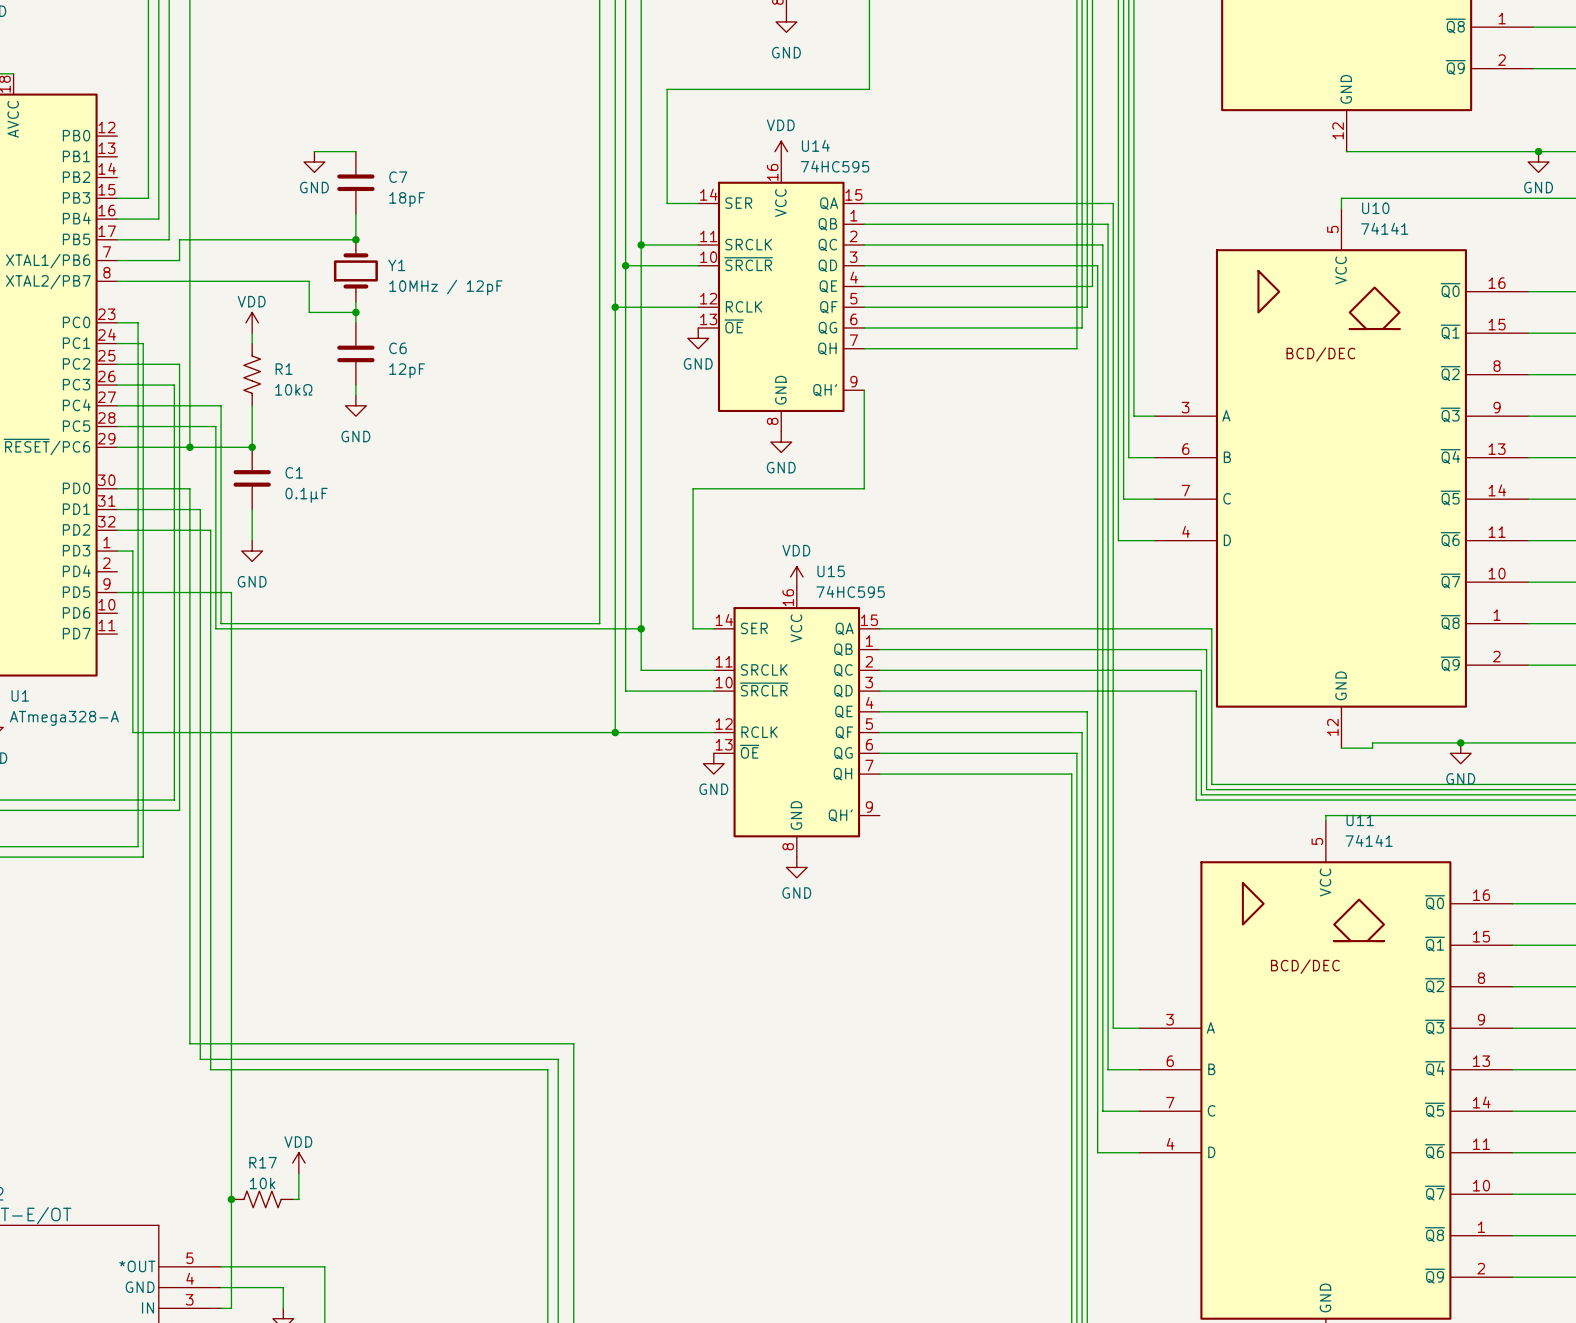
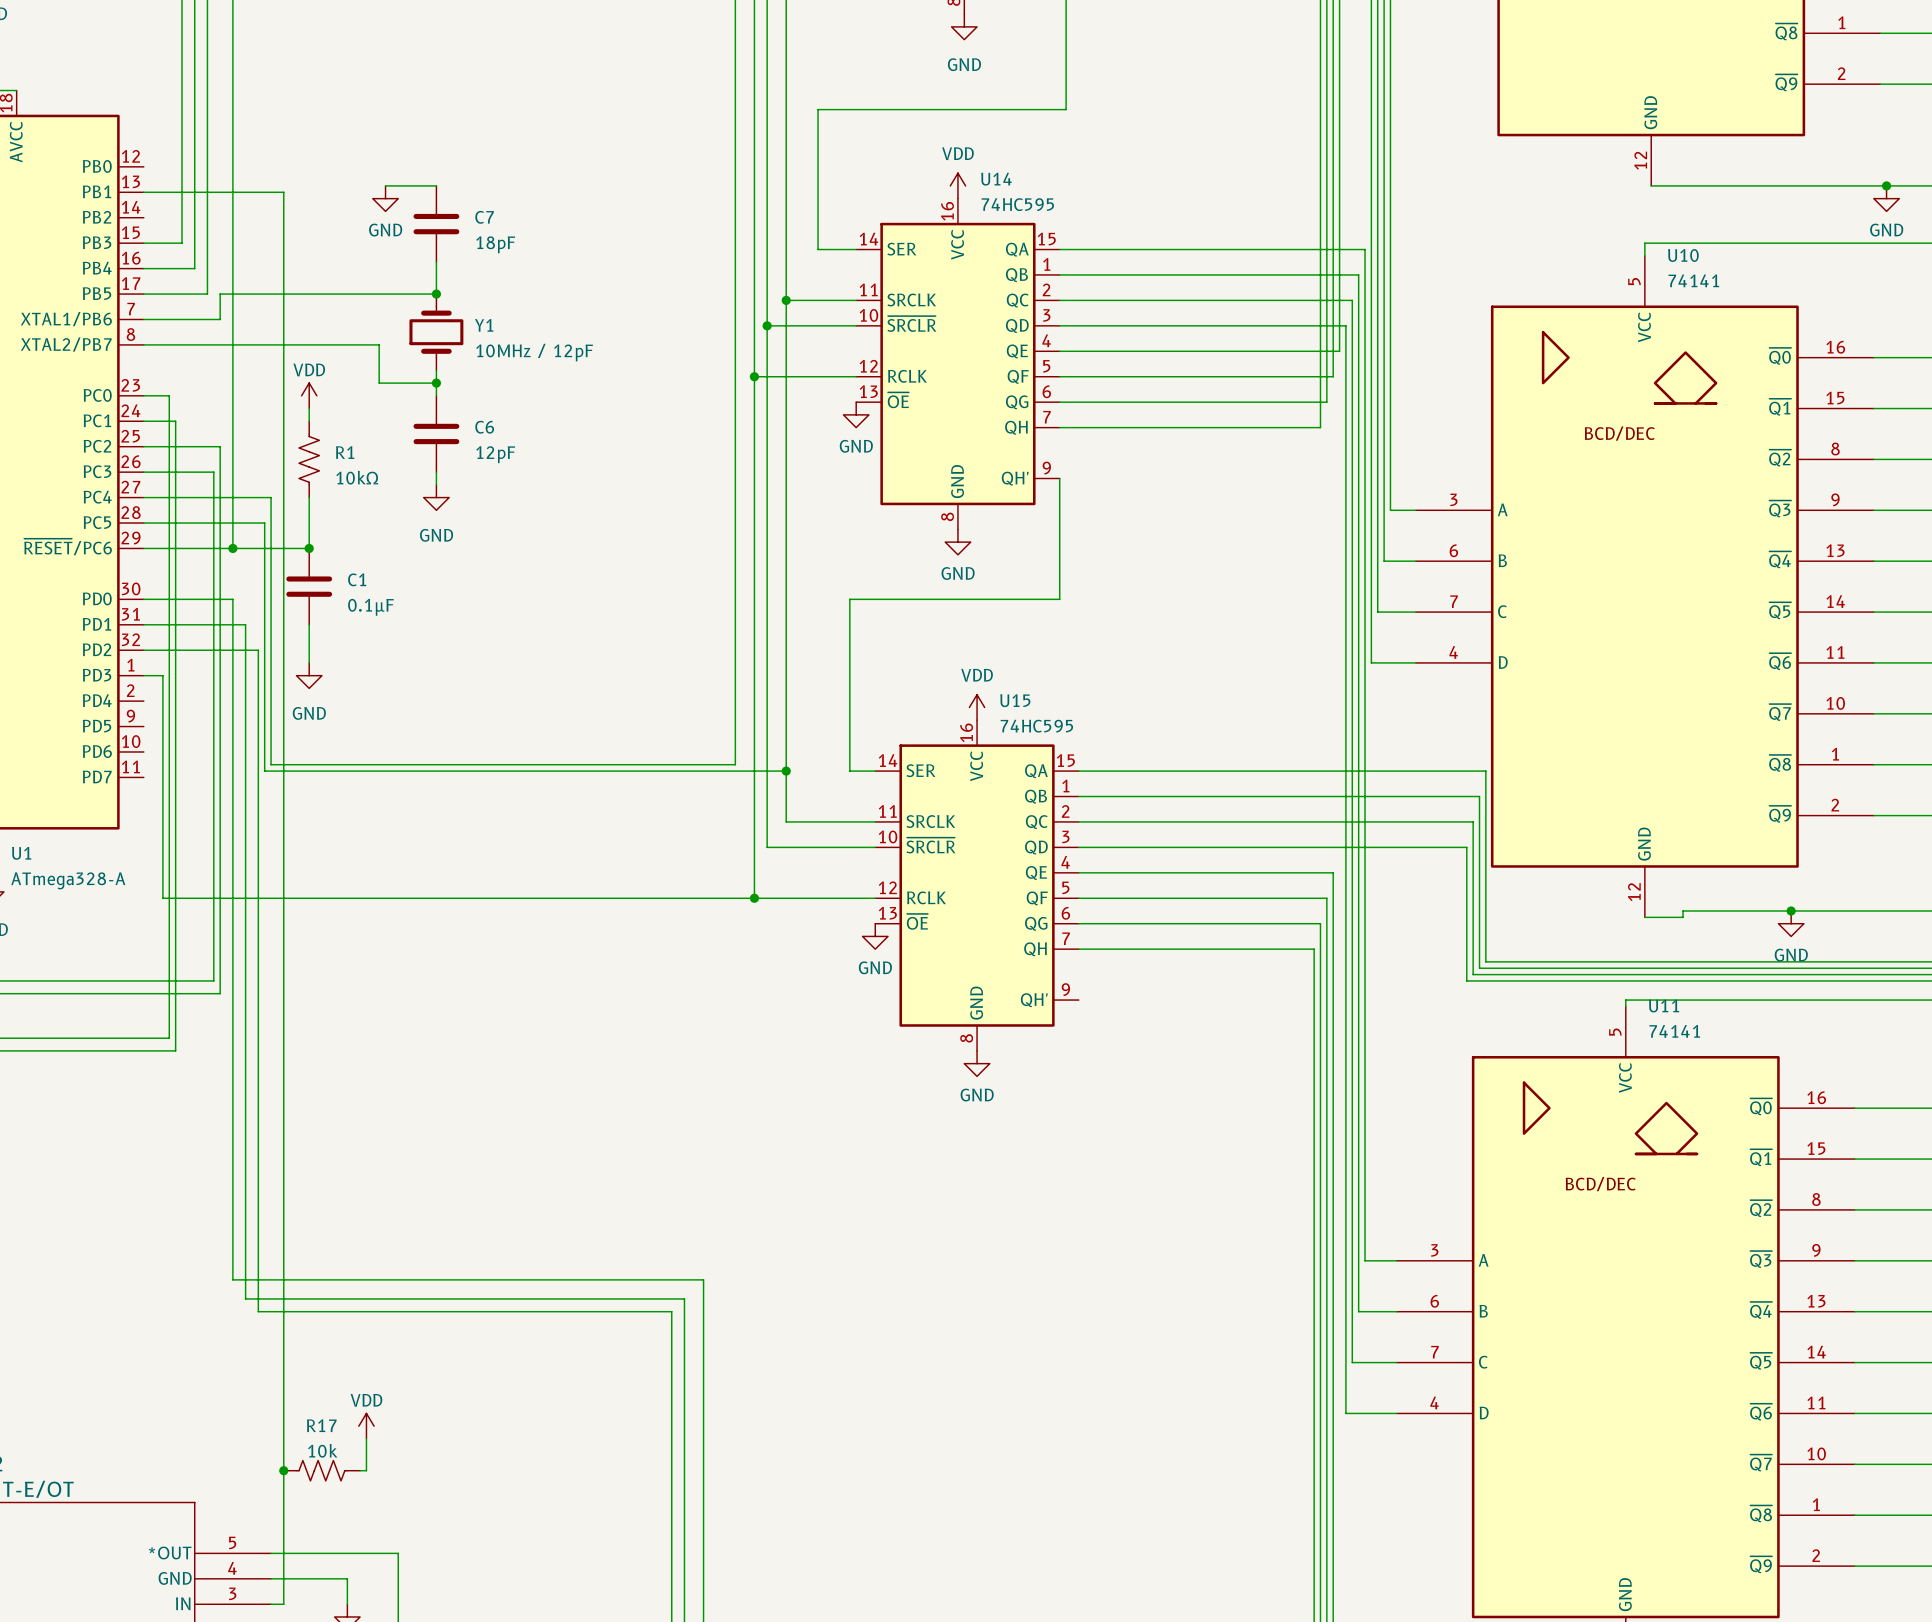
wire: (117, 592) (231, 592) -> (143, 192) (283, 192) (283, 726)

